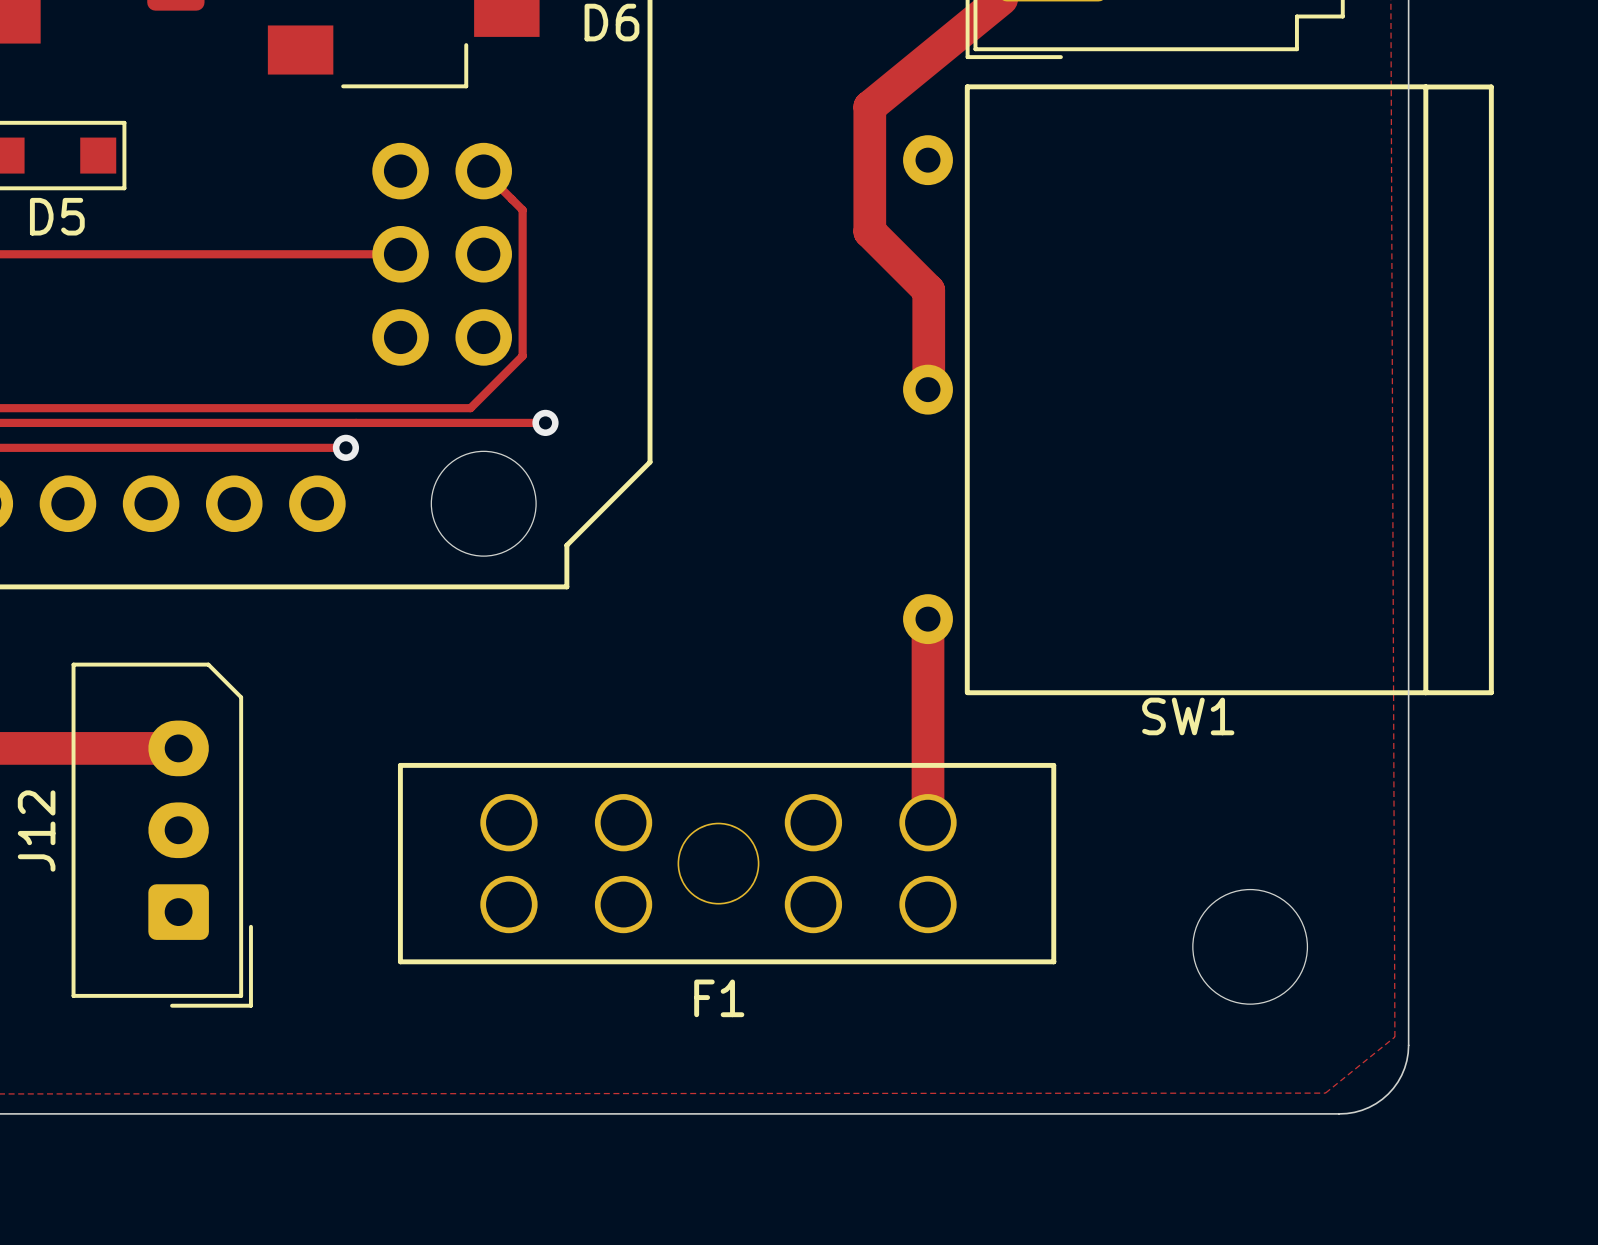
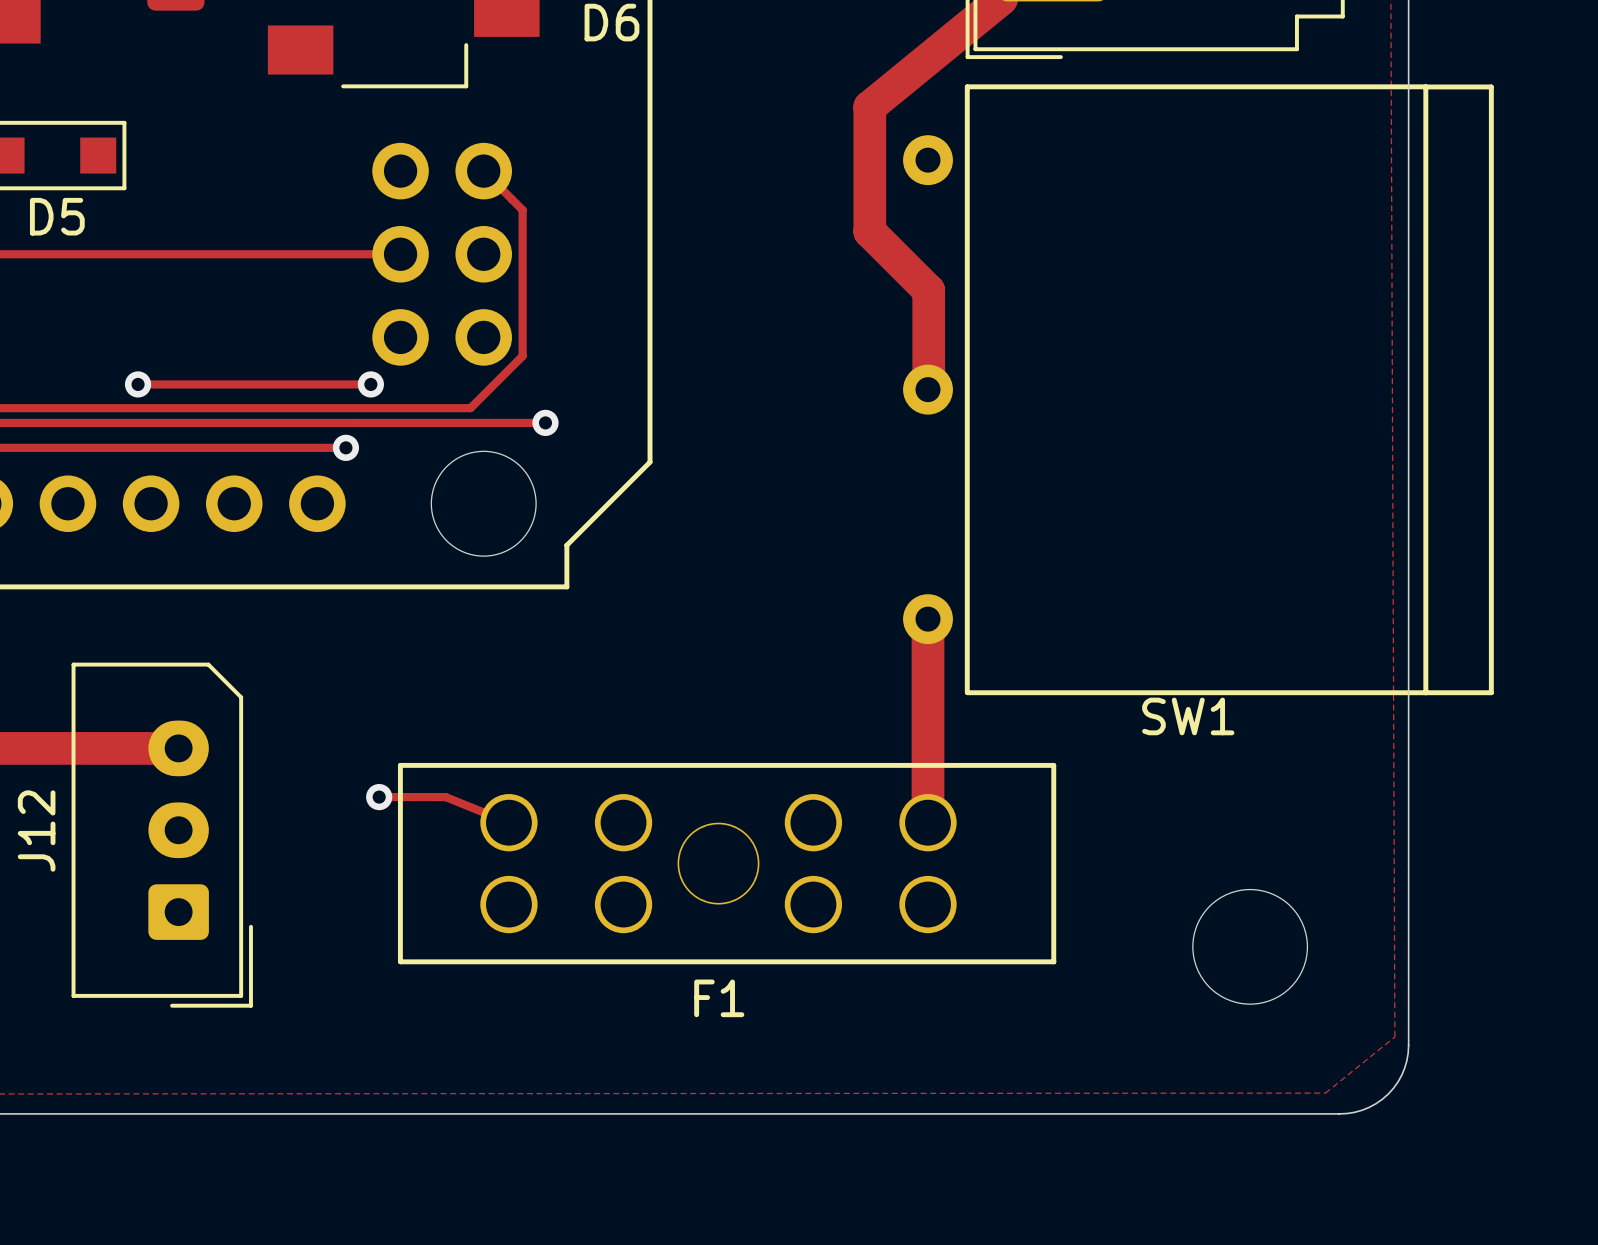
track: none -> (138, 384) (370, 384)
via: none -> (138, 384)
via: none -> (370, 384)
track: none -> (379, 797) (445, 797) (508, 822)
via: none -> (379, 797)

